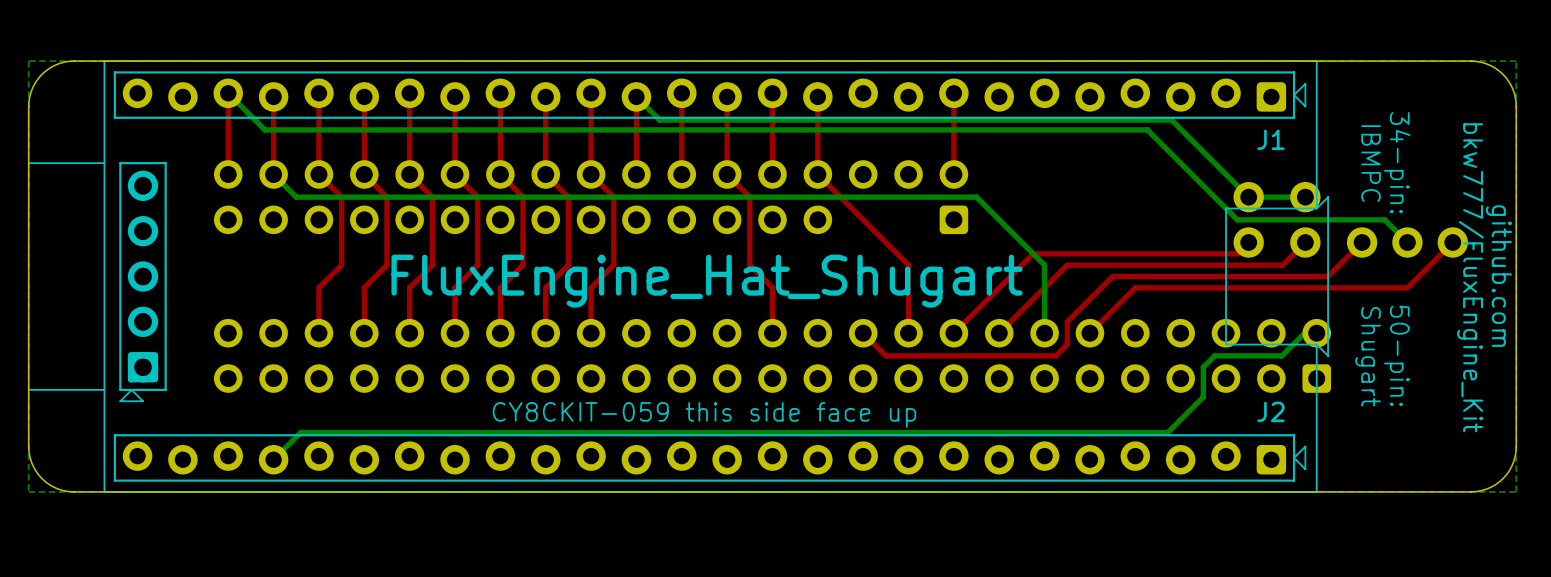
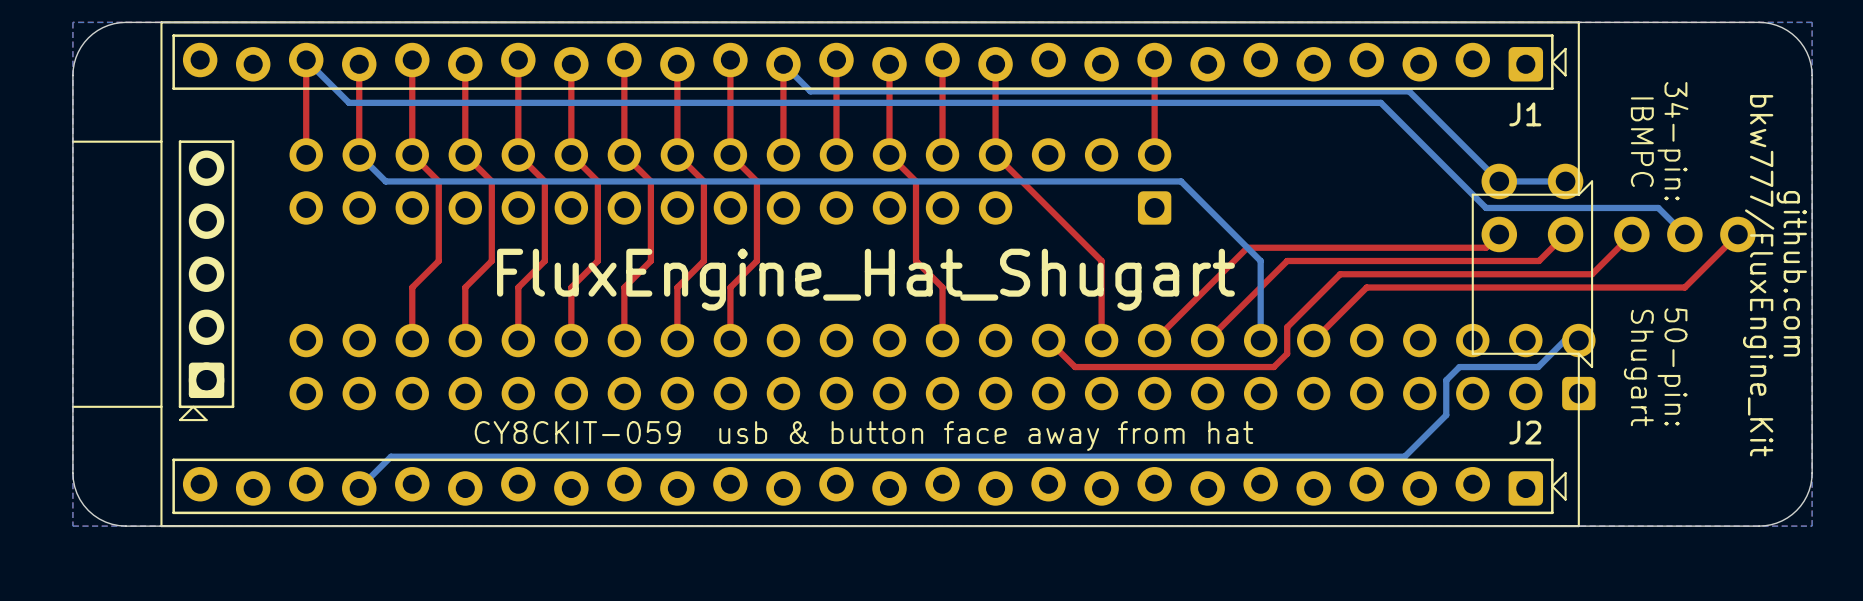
text: CY8CKIT-059 this side face up (704, 414) -> CY8CKIT-059 usb & button face away from hat (863, 436)

